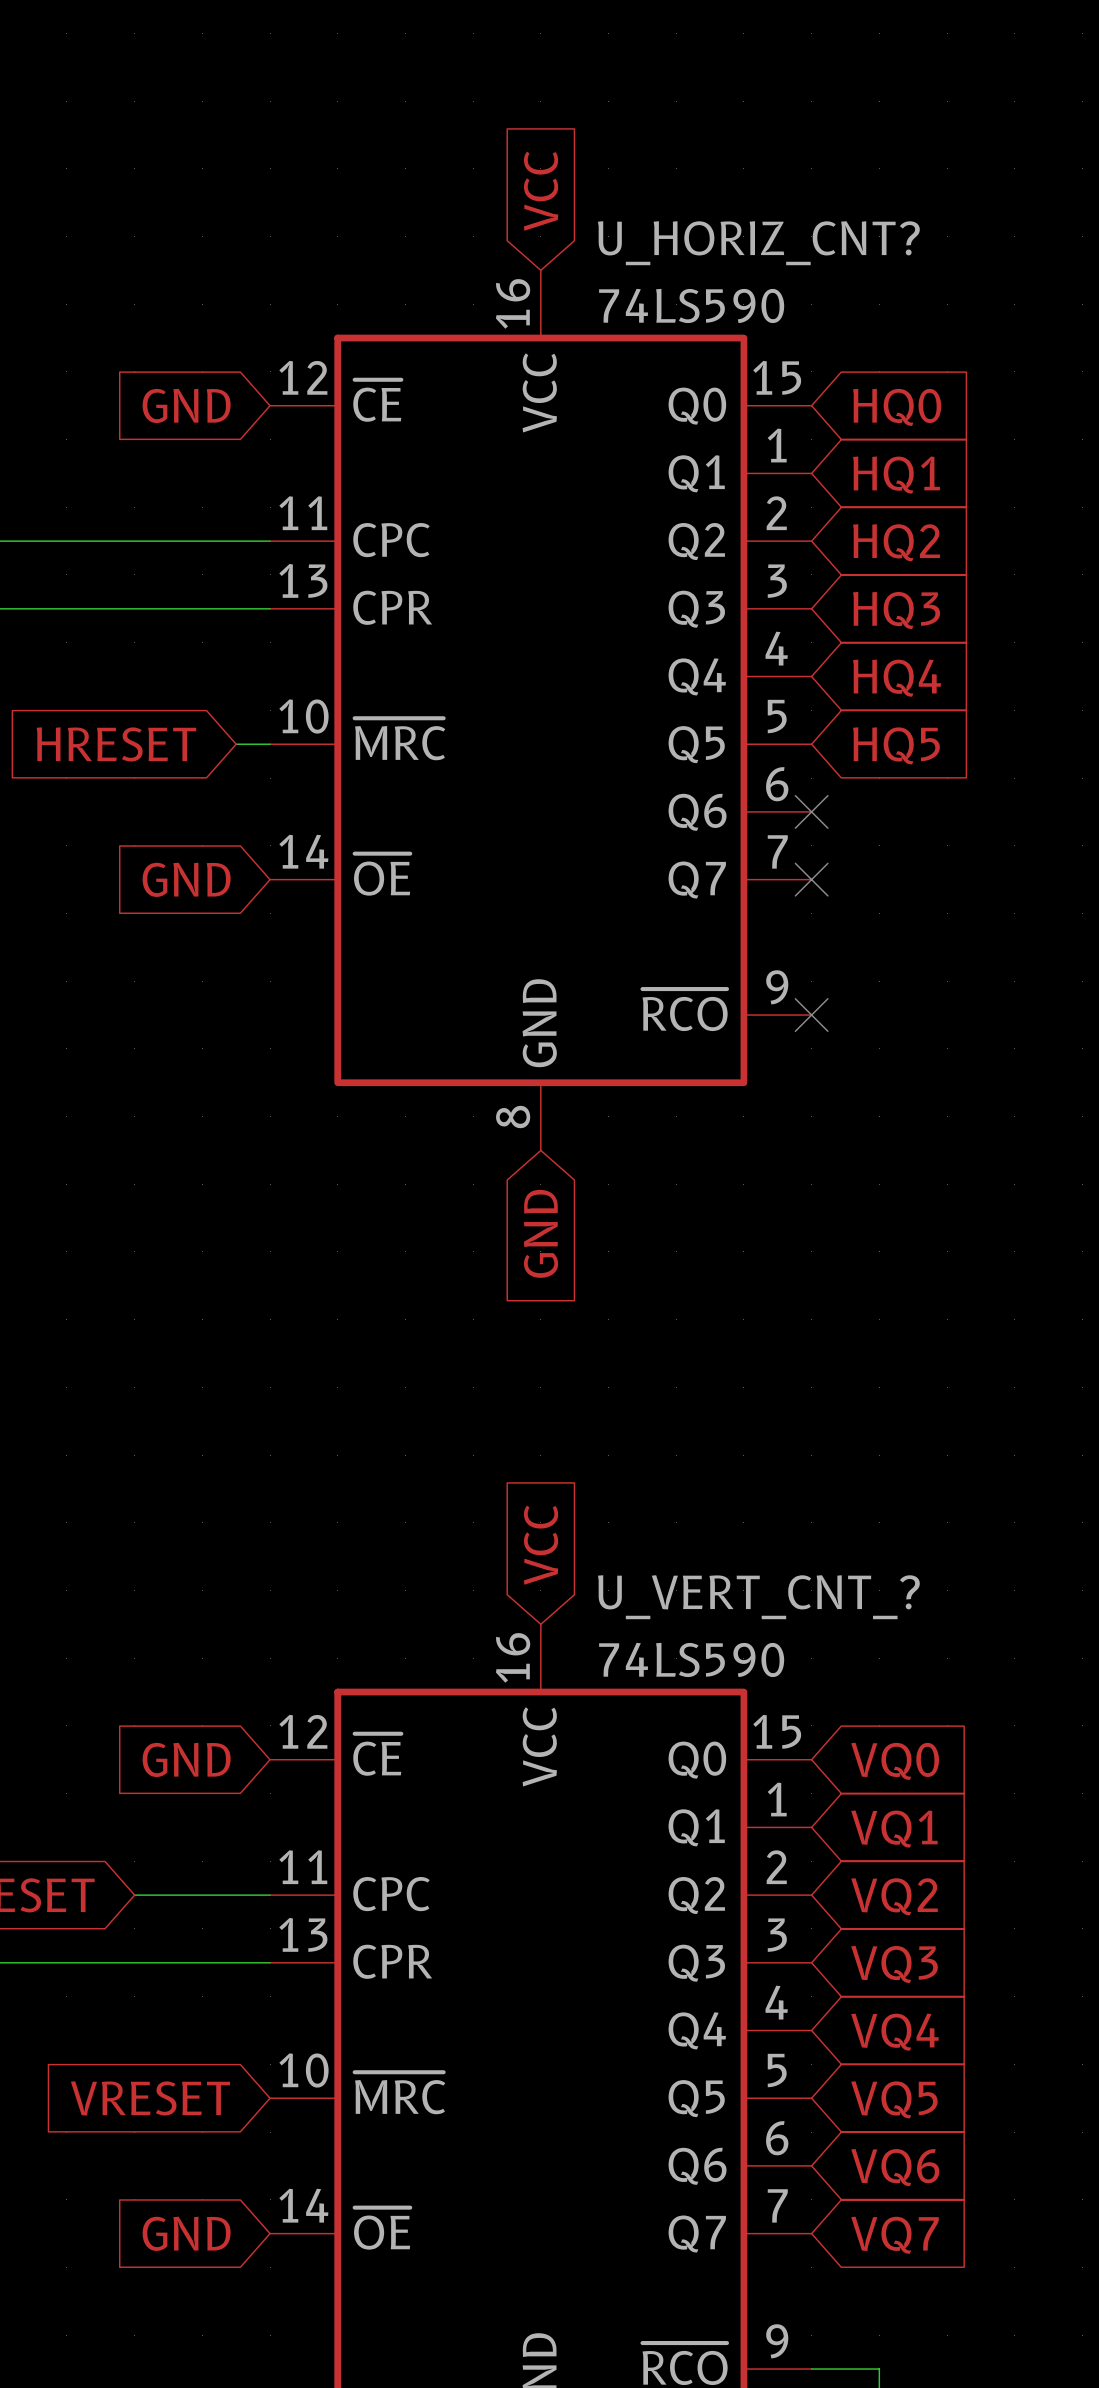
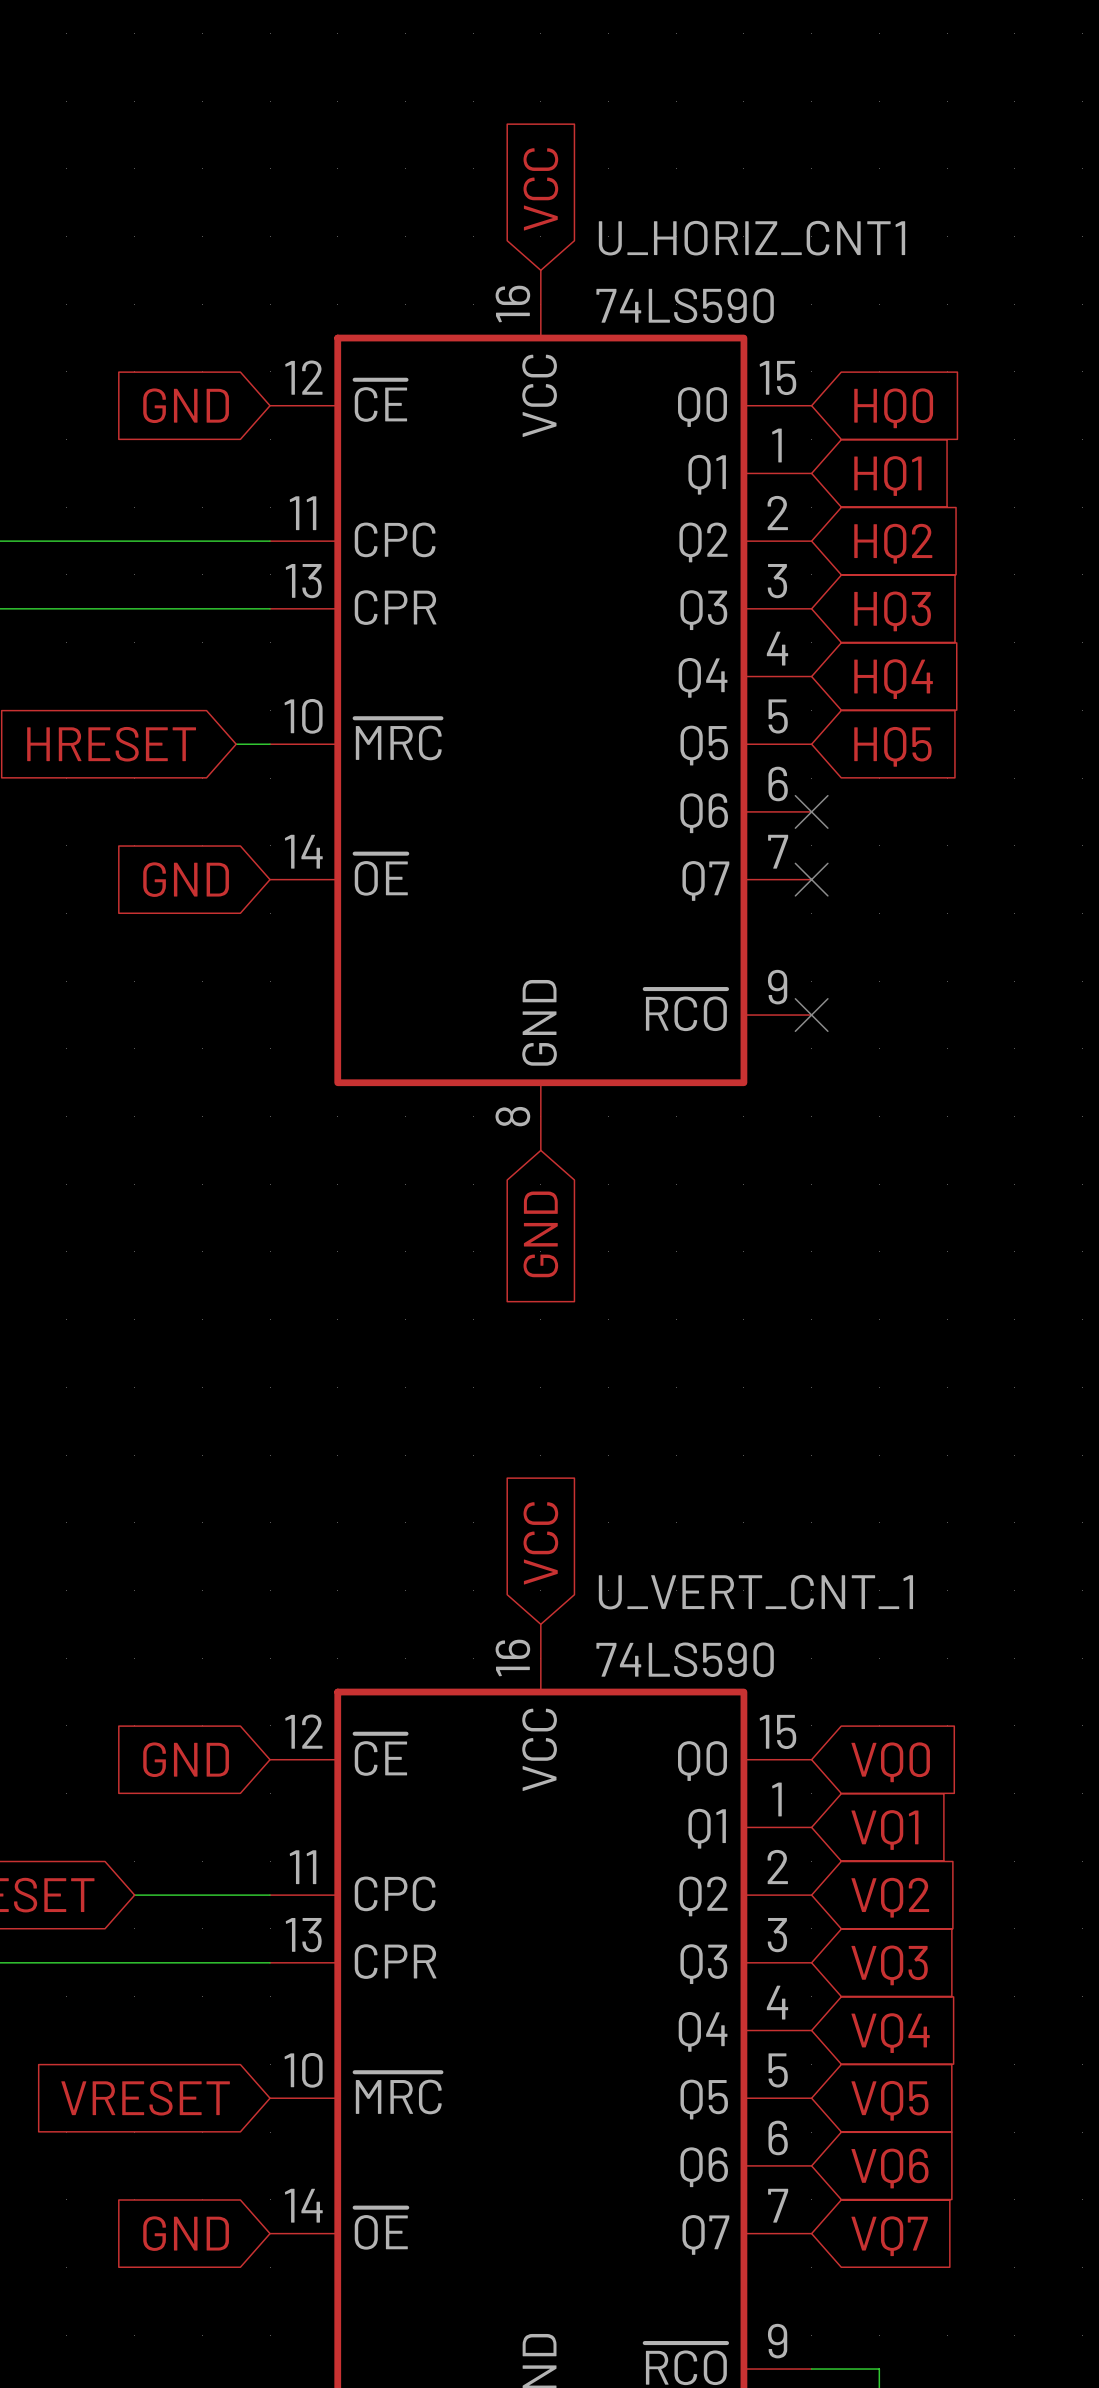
U_HORIZ_CNT? name: U_HORIZ_CNT? (758, 243) -> U_HORIZ_CNT1 (751, 238)
U_VERT_CNT_? name: U_VERT_CNT_? (758, 1597) -> U_VERT_CNT_1 (755, 1592)

